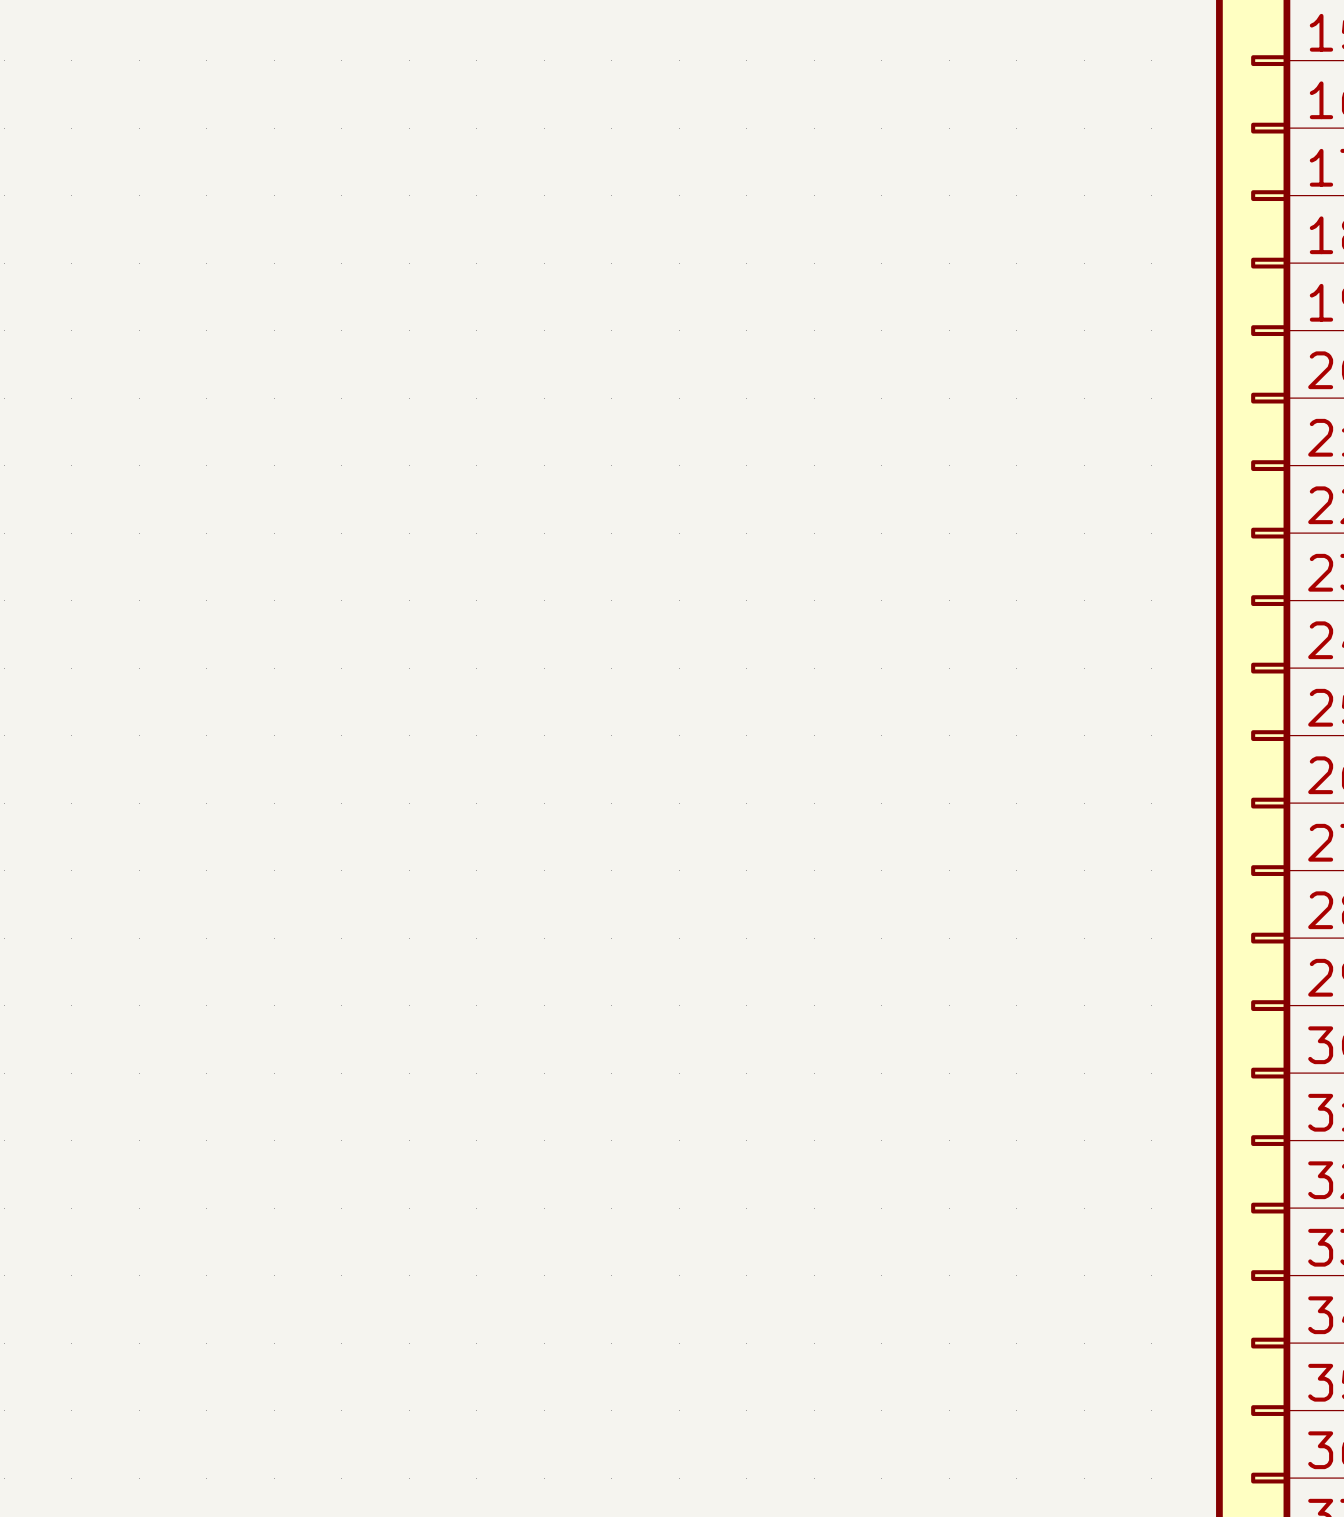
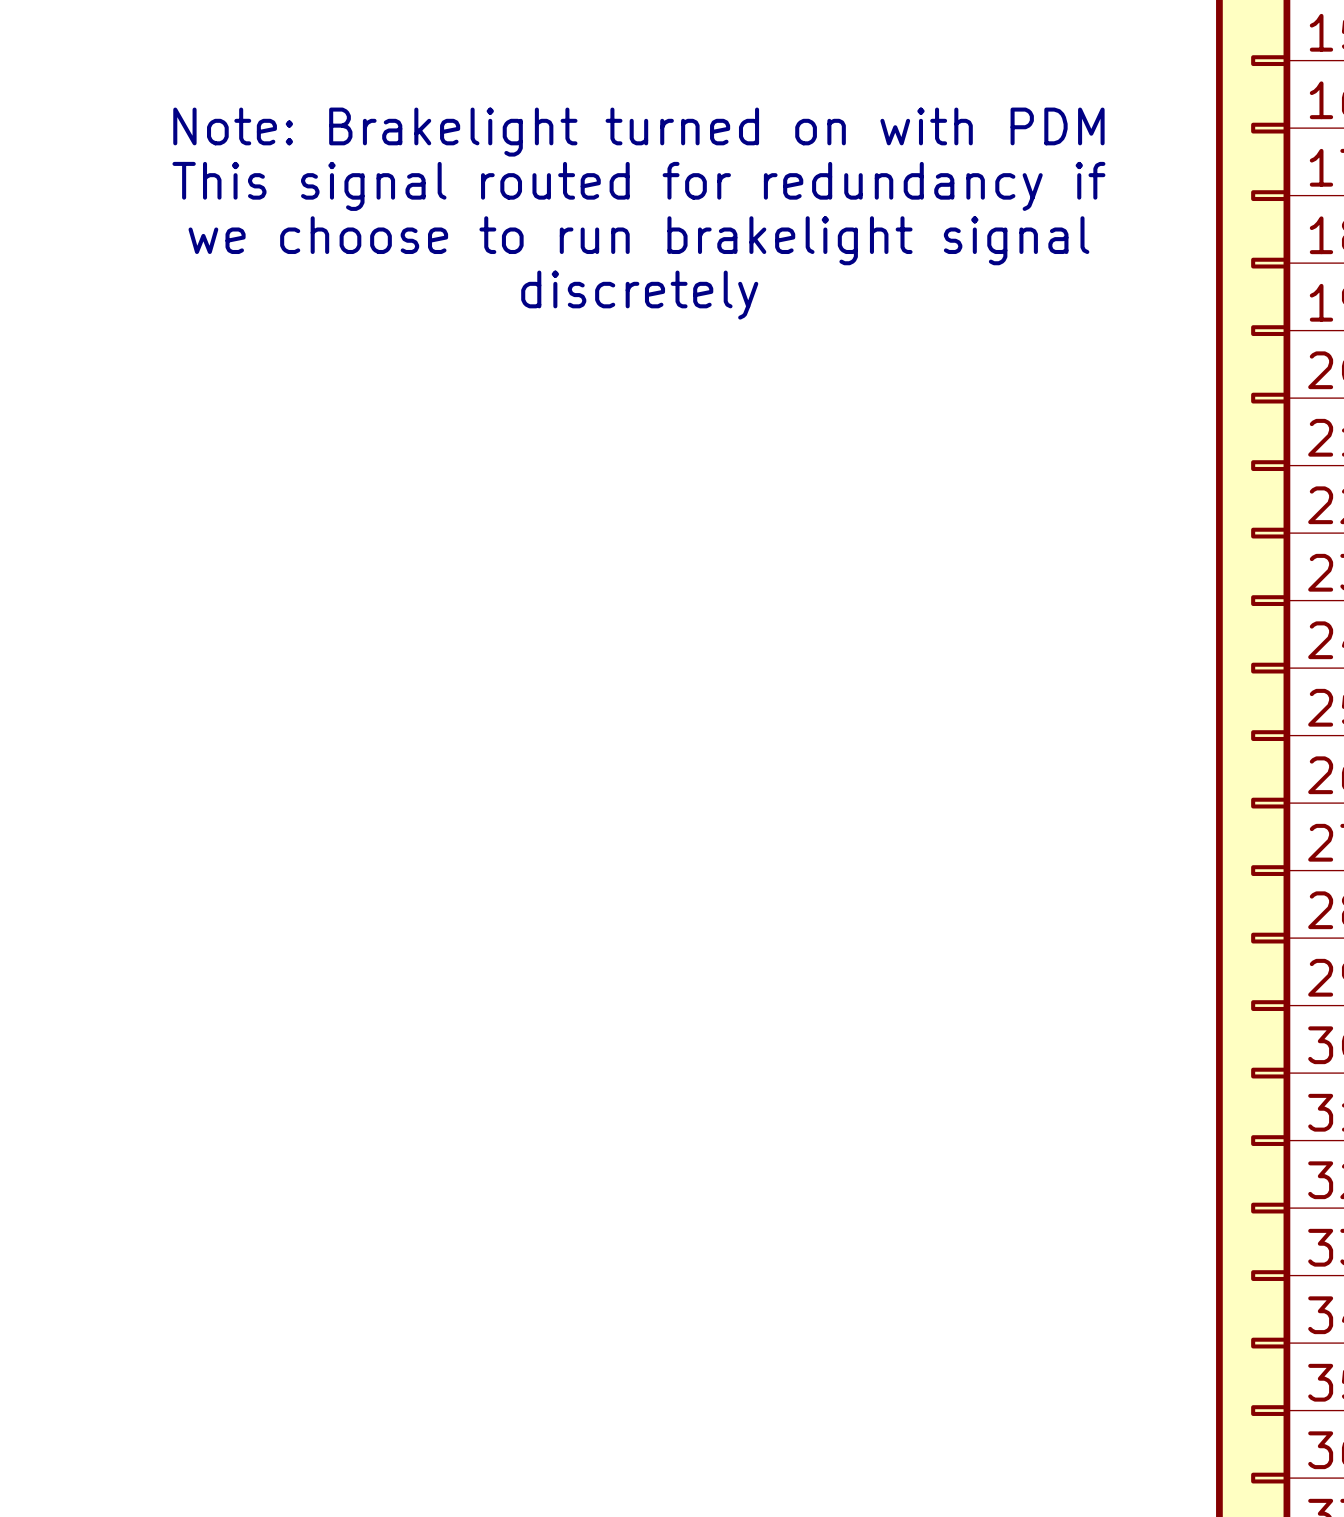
text: none -> Note: Brakelight turned on with PDM (638, 132)
text: none -> This signal routed for redundancy if (638, 186)
text: none -> we choose to run brakelight signal (638, 240)
text: none -> discretely (639, 295)

